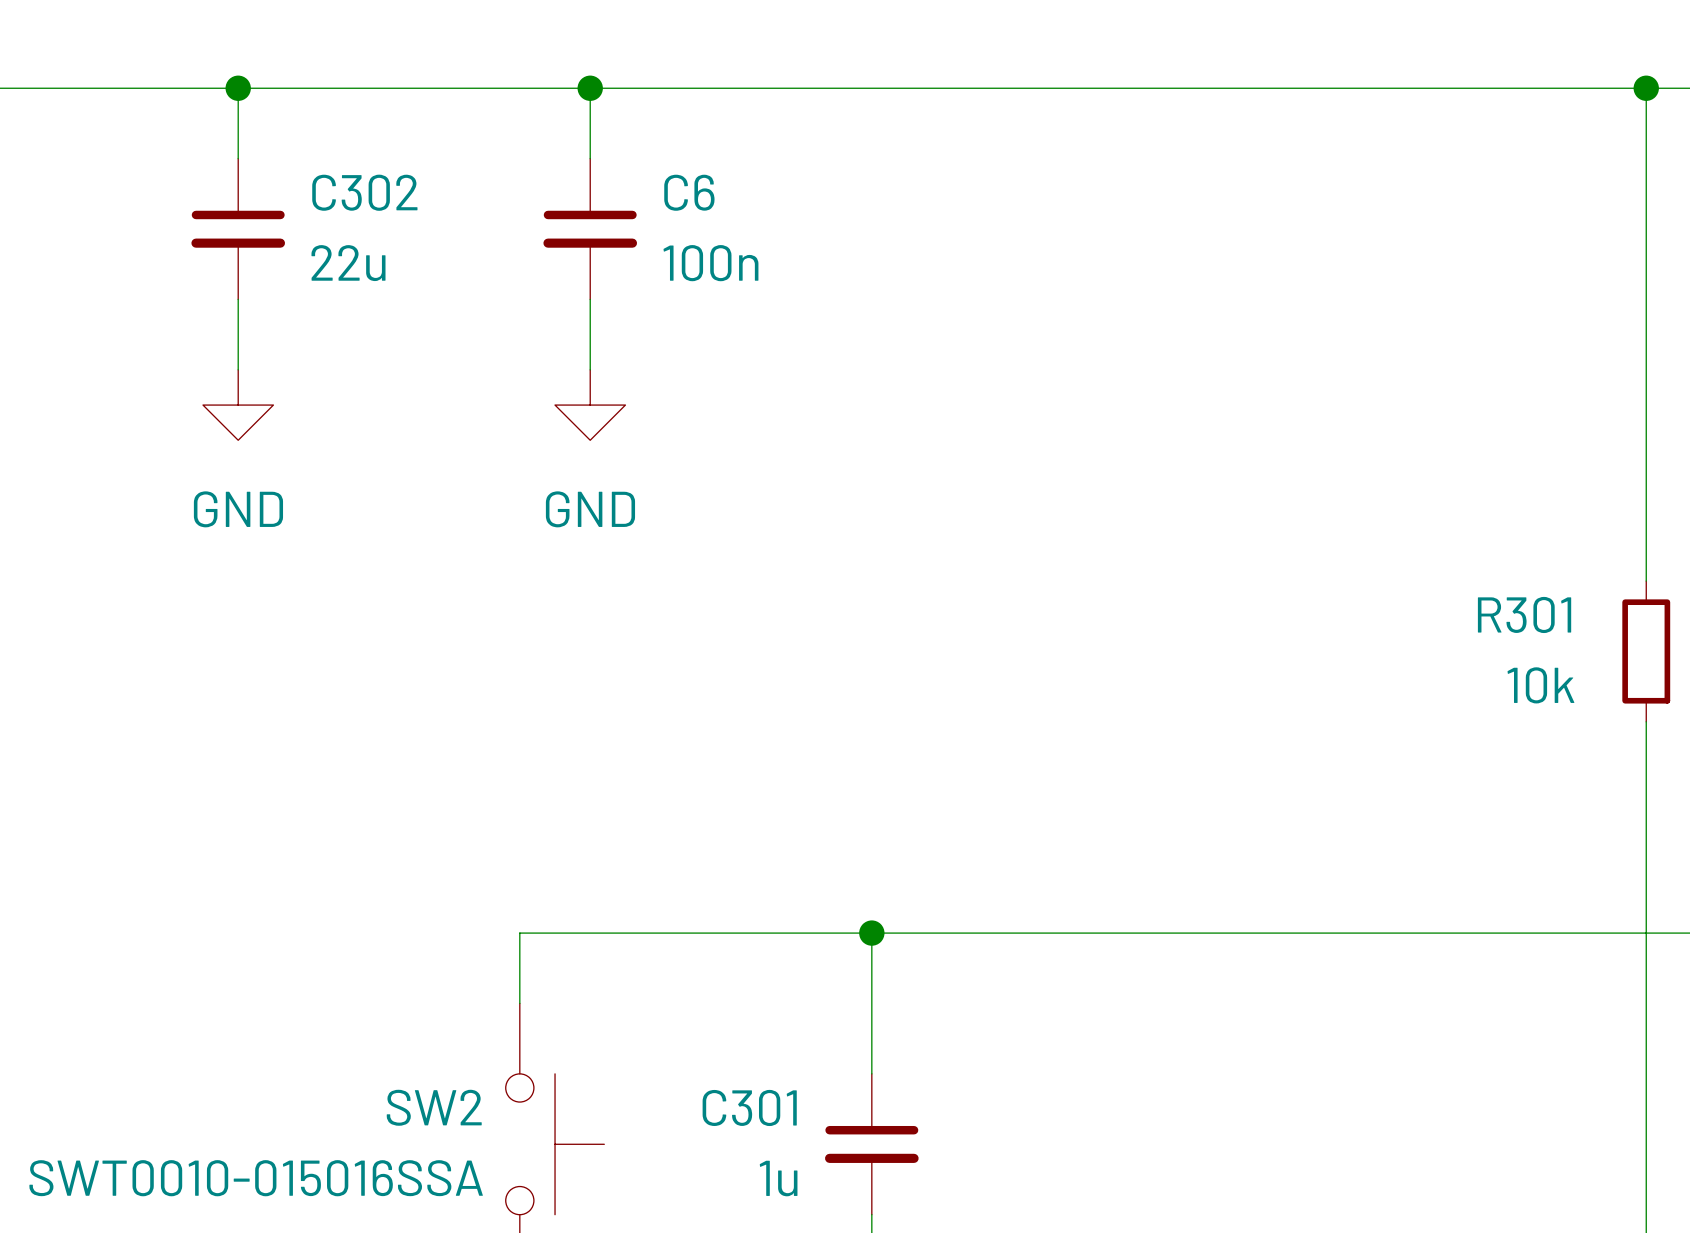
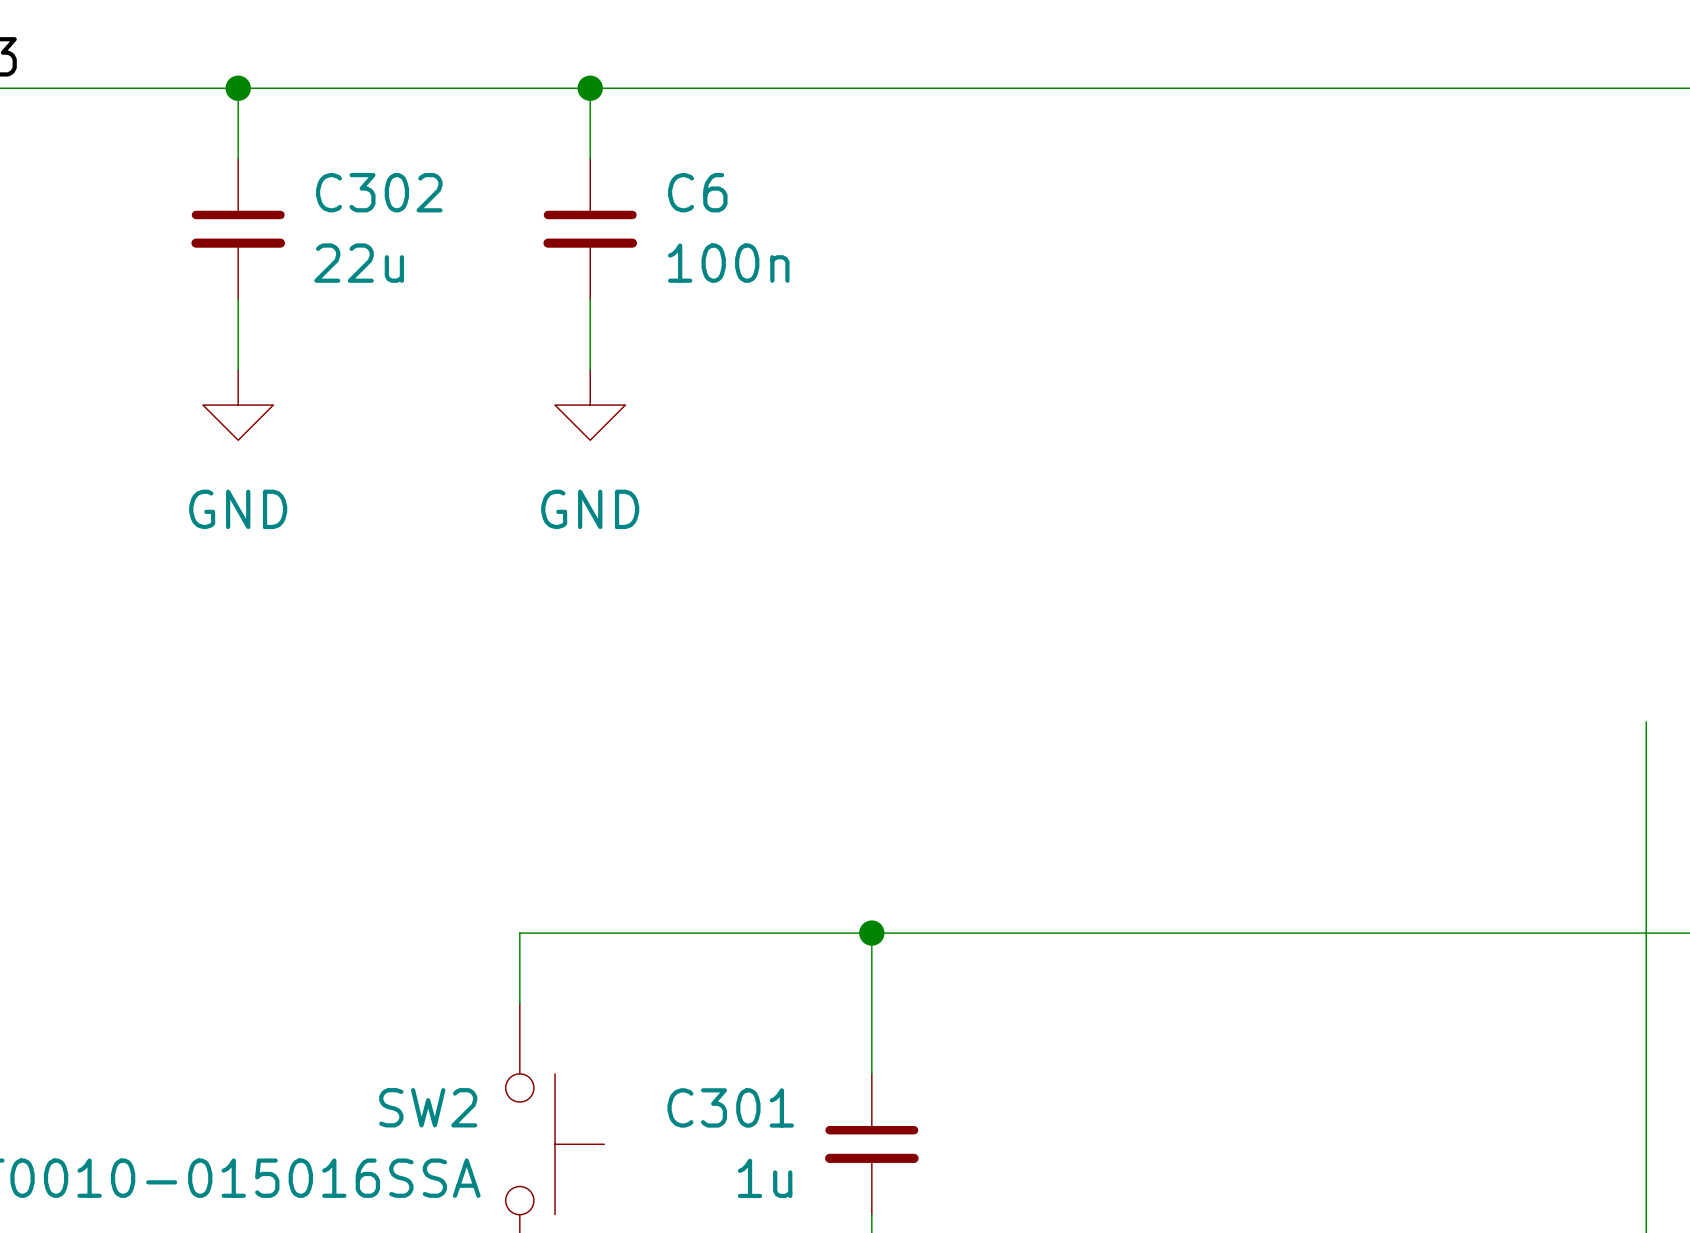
wire: (1646, 88) (1646, 581) -> none
junction: (1646, 88) -> none
R301: 10k (1646, 651) -> none

